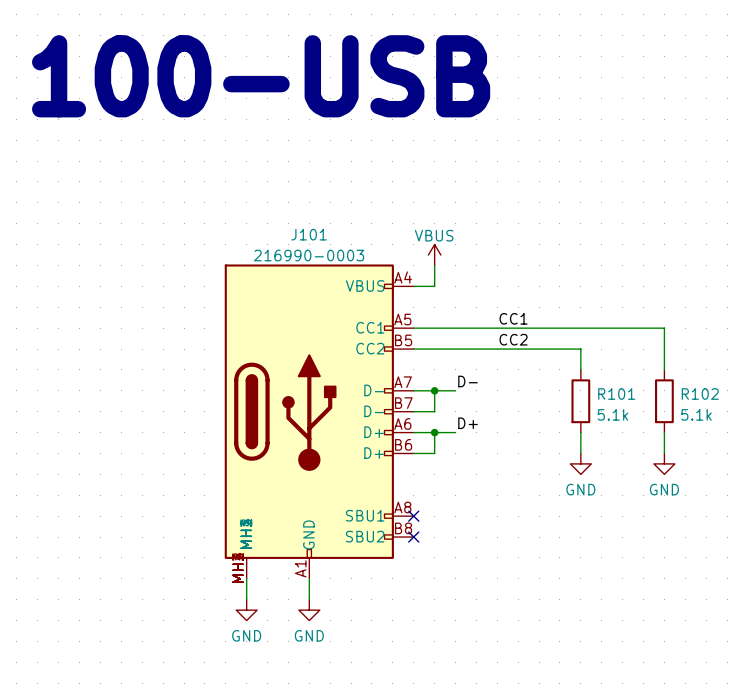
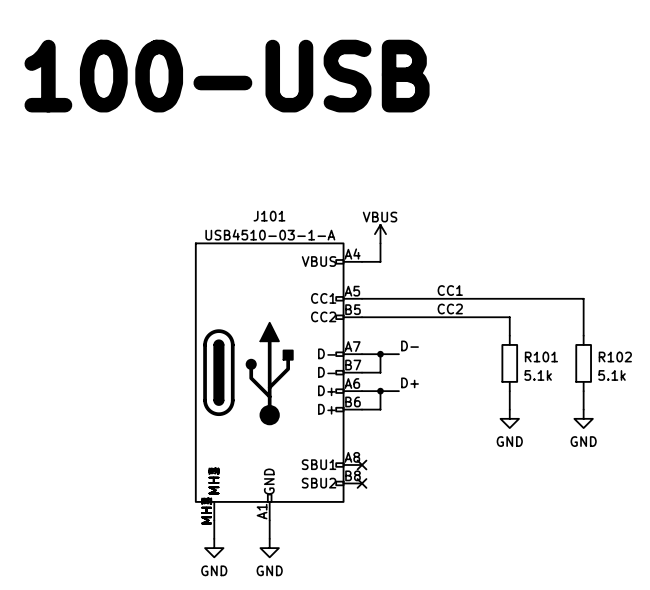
J101 value: 216990-0003 (309, 255) -> USB4510-03-1-A (270, 234)

